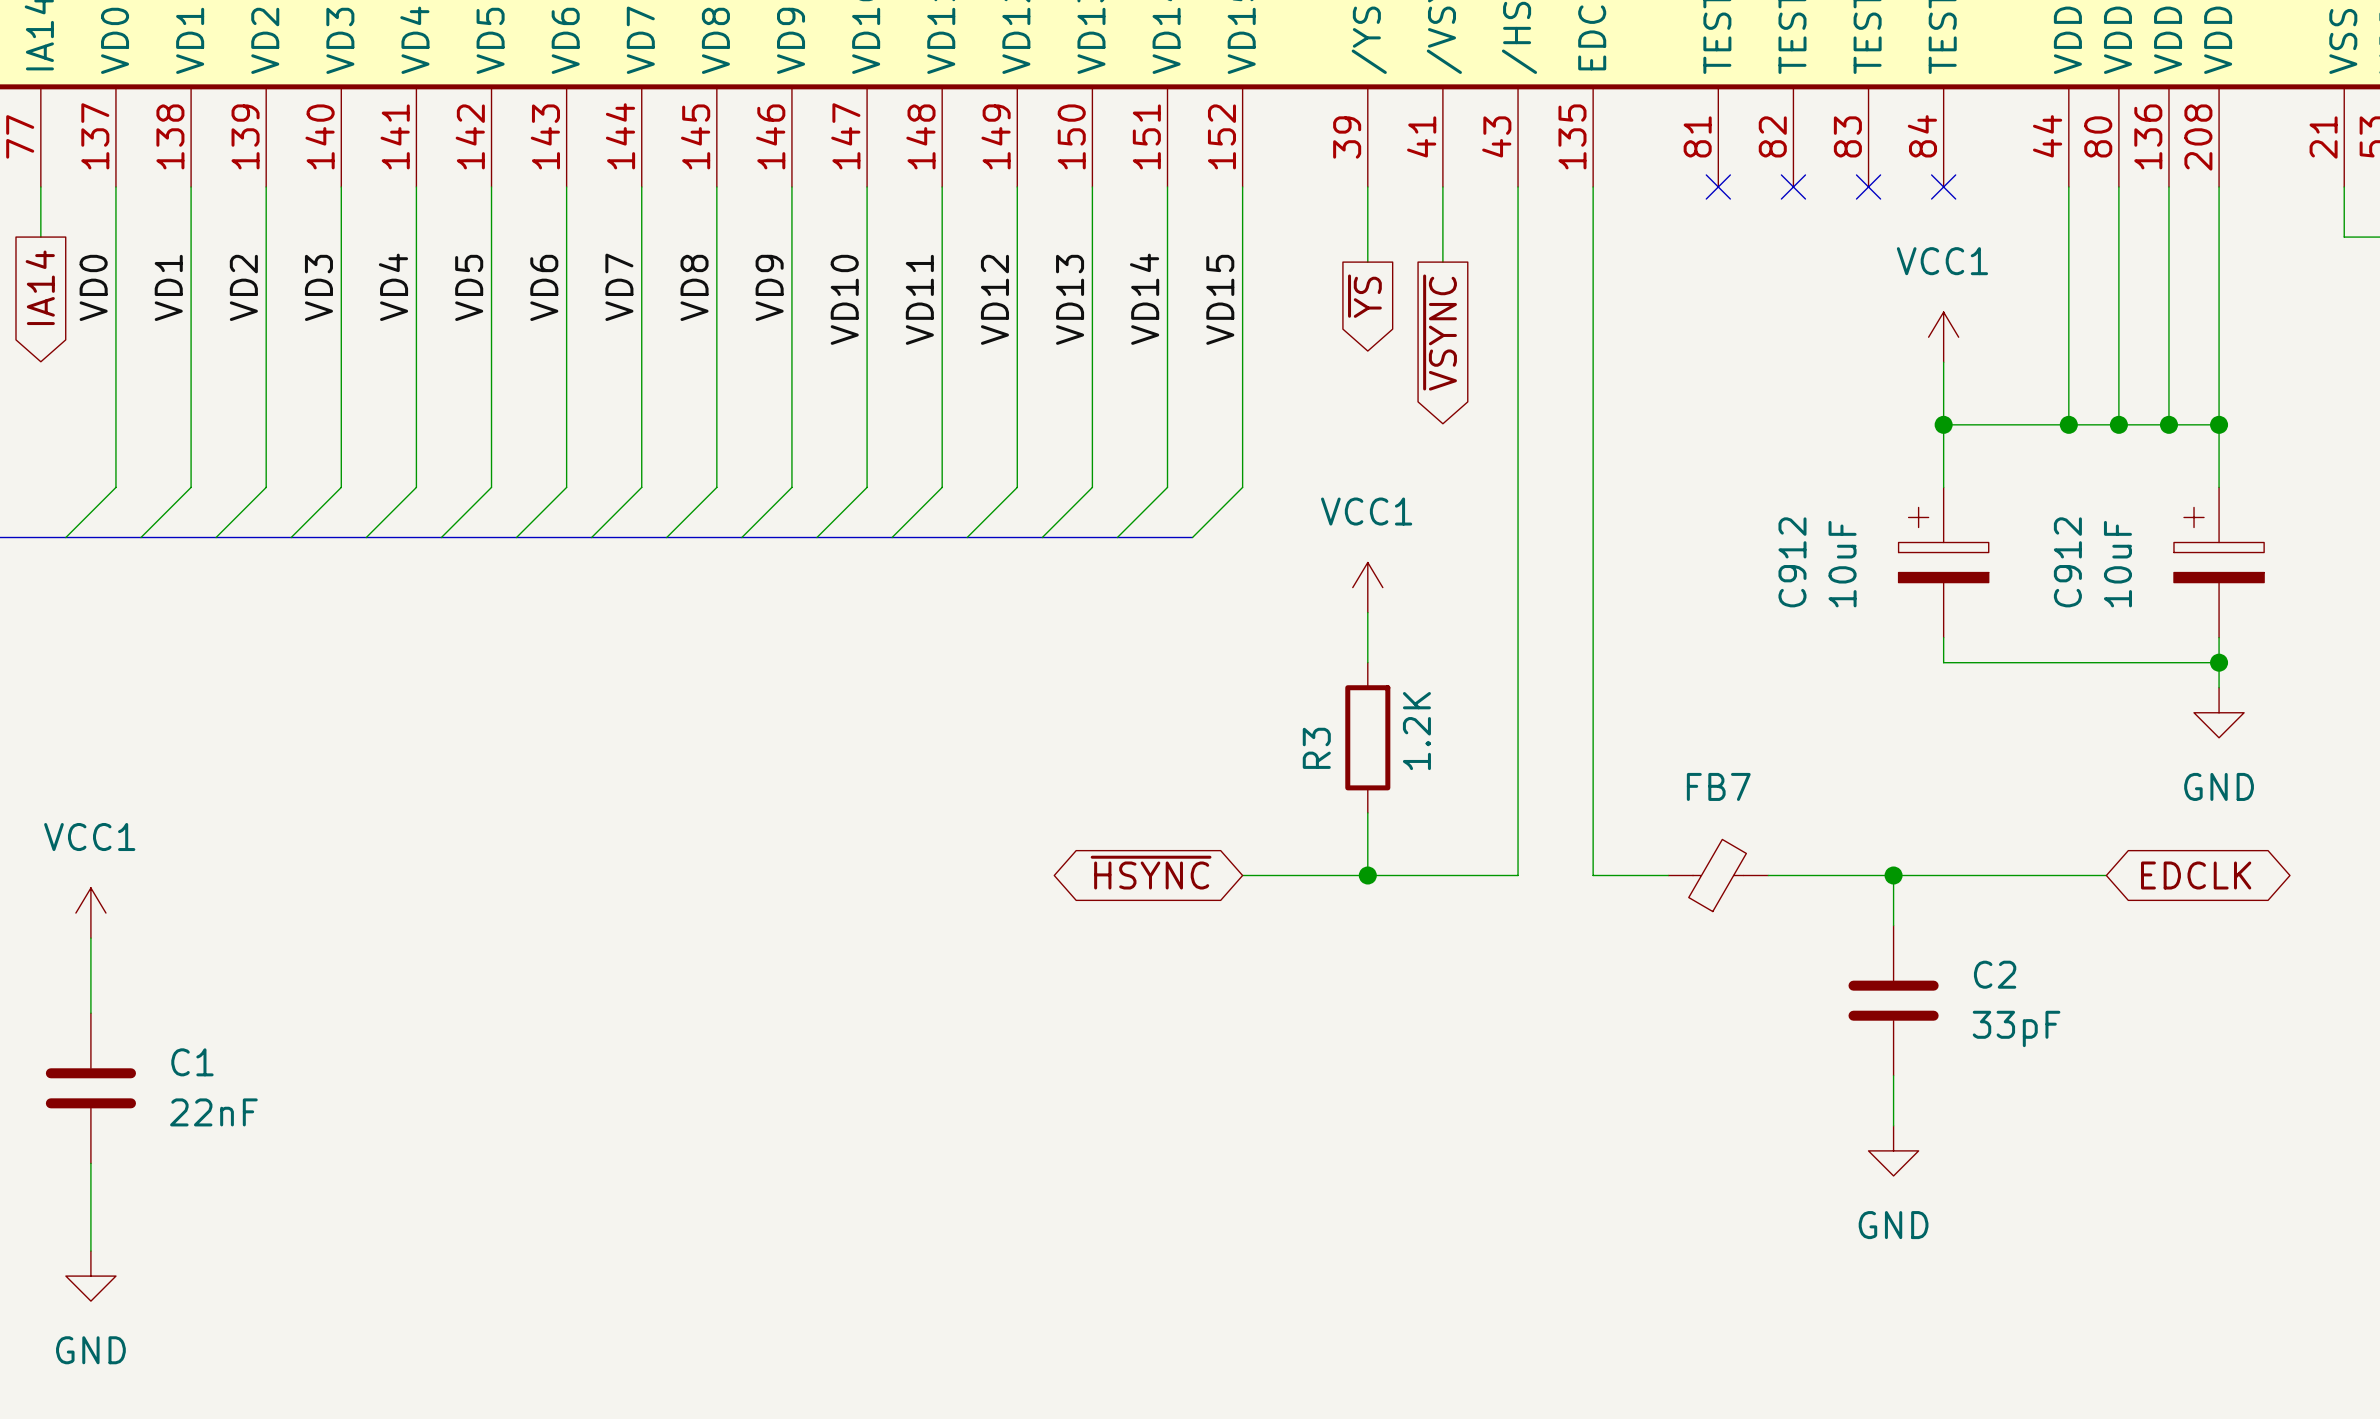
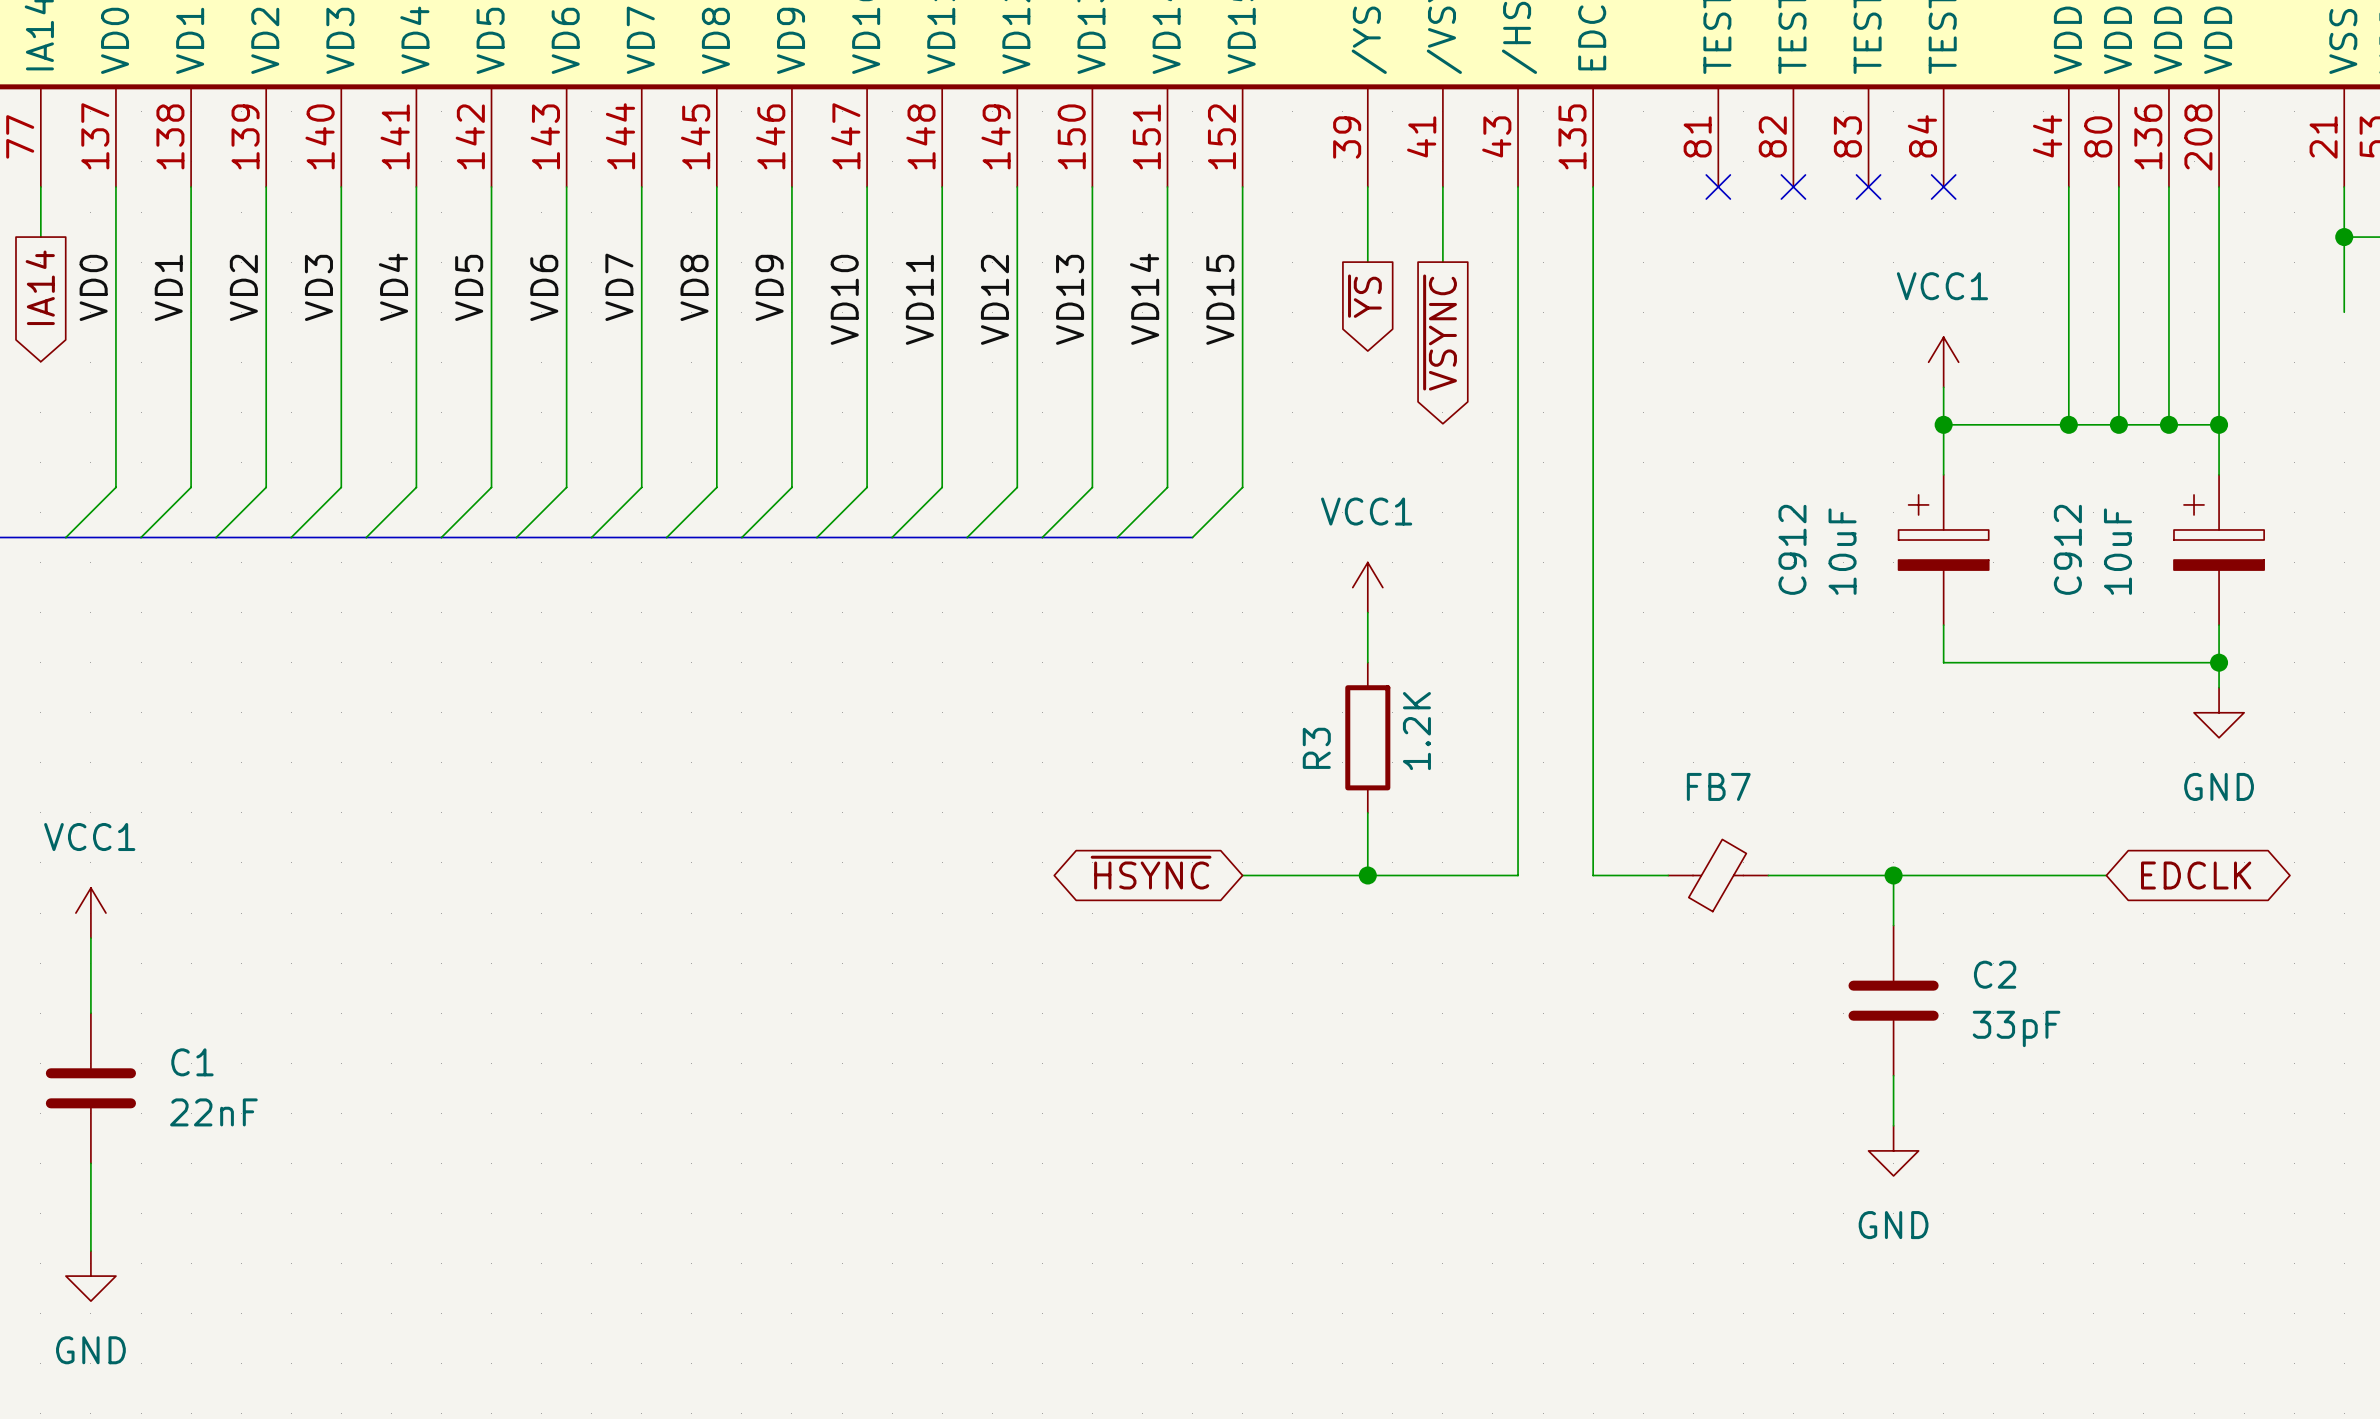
wire: none -> (2344, 237) (2344, 312)
junction: none -> (2344, 237)
power symbol position: VCC1 (1943, 337) -> VCC1 (1943, 362)
C912 position: (1943, 562) -> (1943, 550)
C912 position: (2219, 562) -> (2219, 550)

